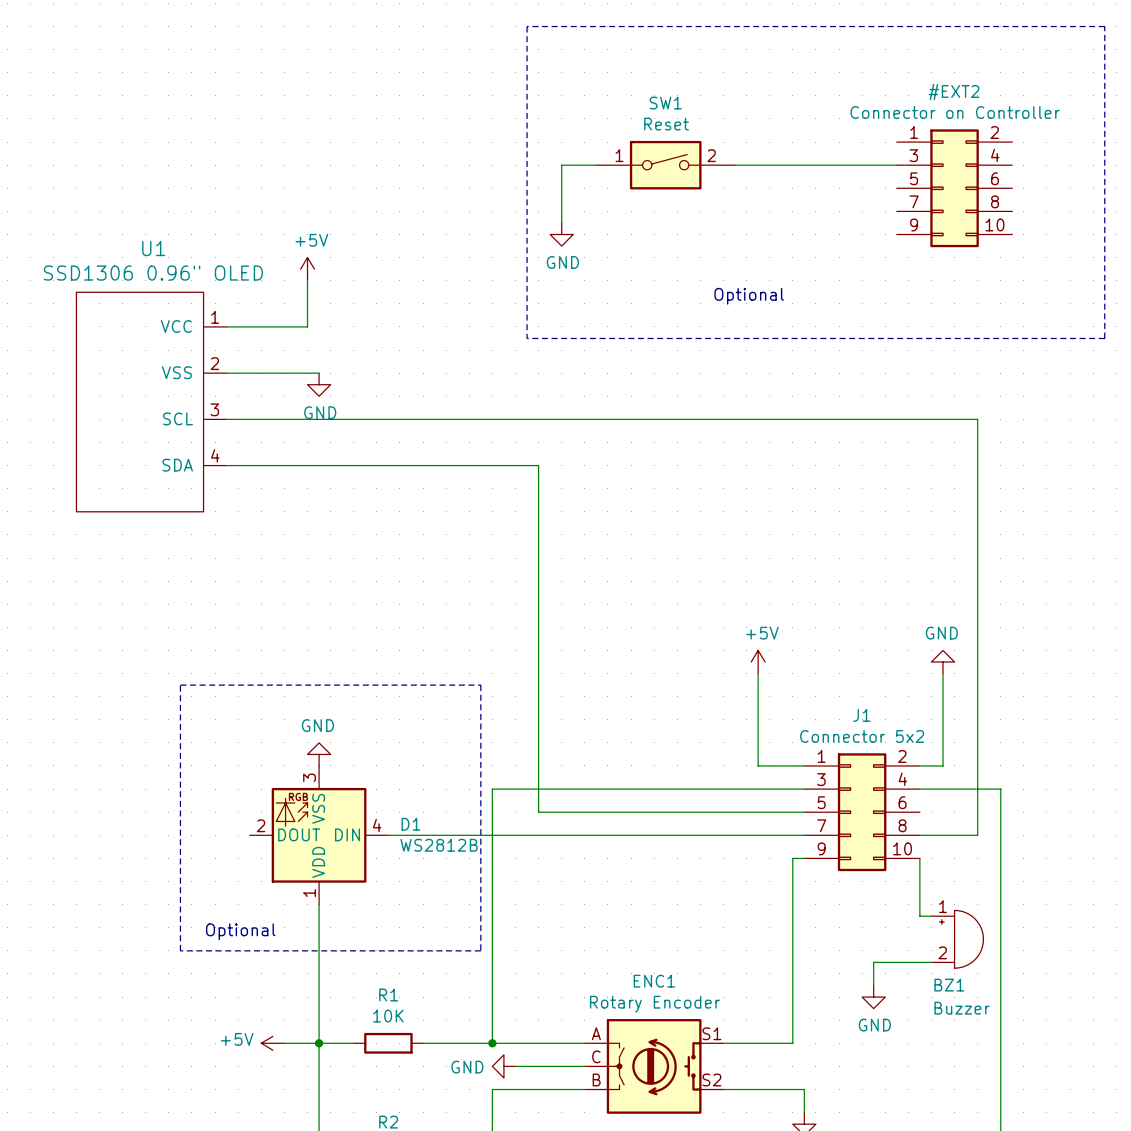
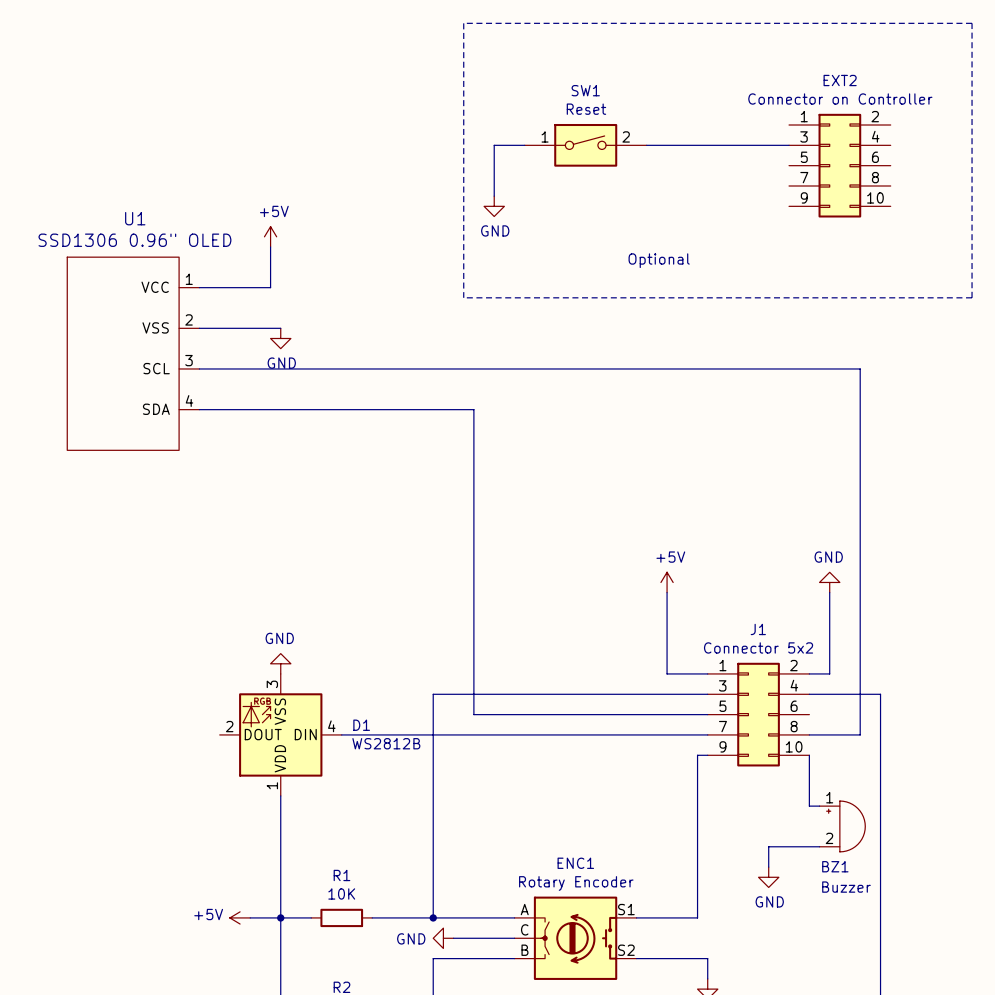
#EXT2: Connector on Controller (954, 188) -> none
EXT2: none -> Connector on Controller (839, 165)
line: (180, 685) (480, 685) (480, 950) (180, 950) (180, 685) -> none
text: Optional (240, 931) -> none

